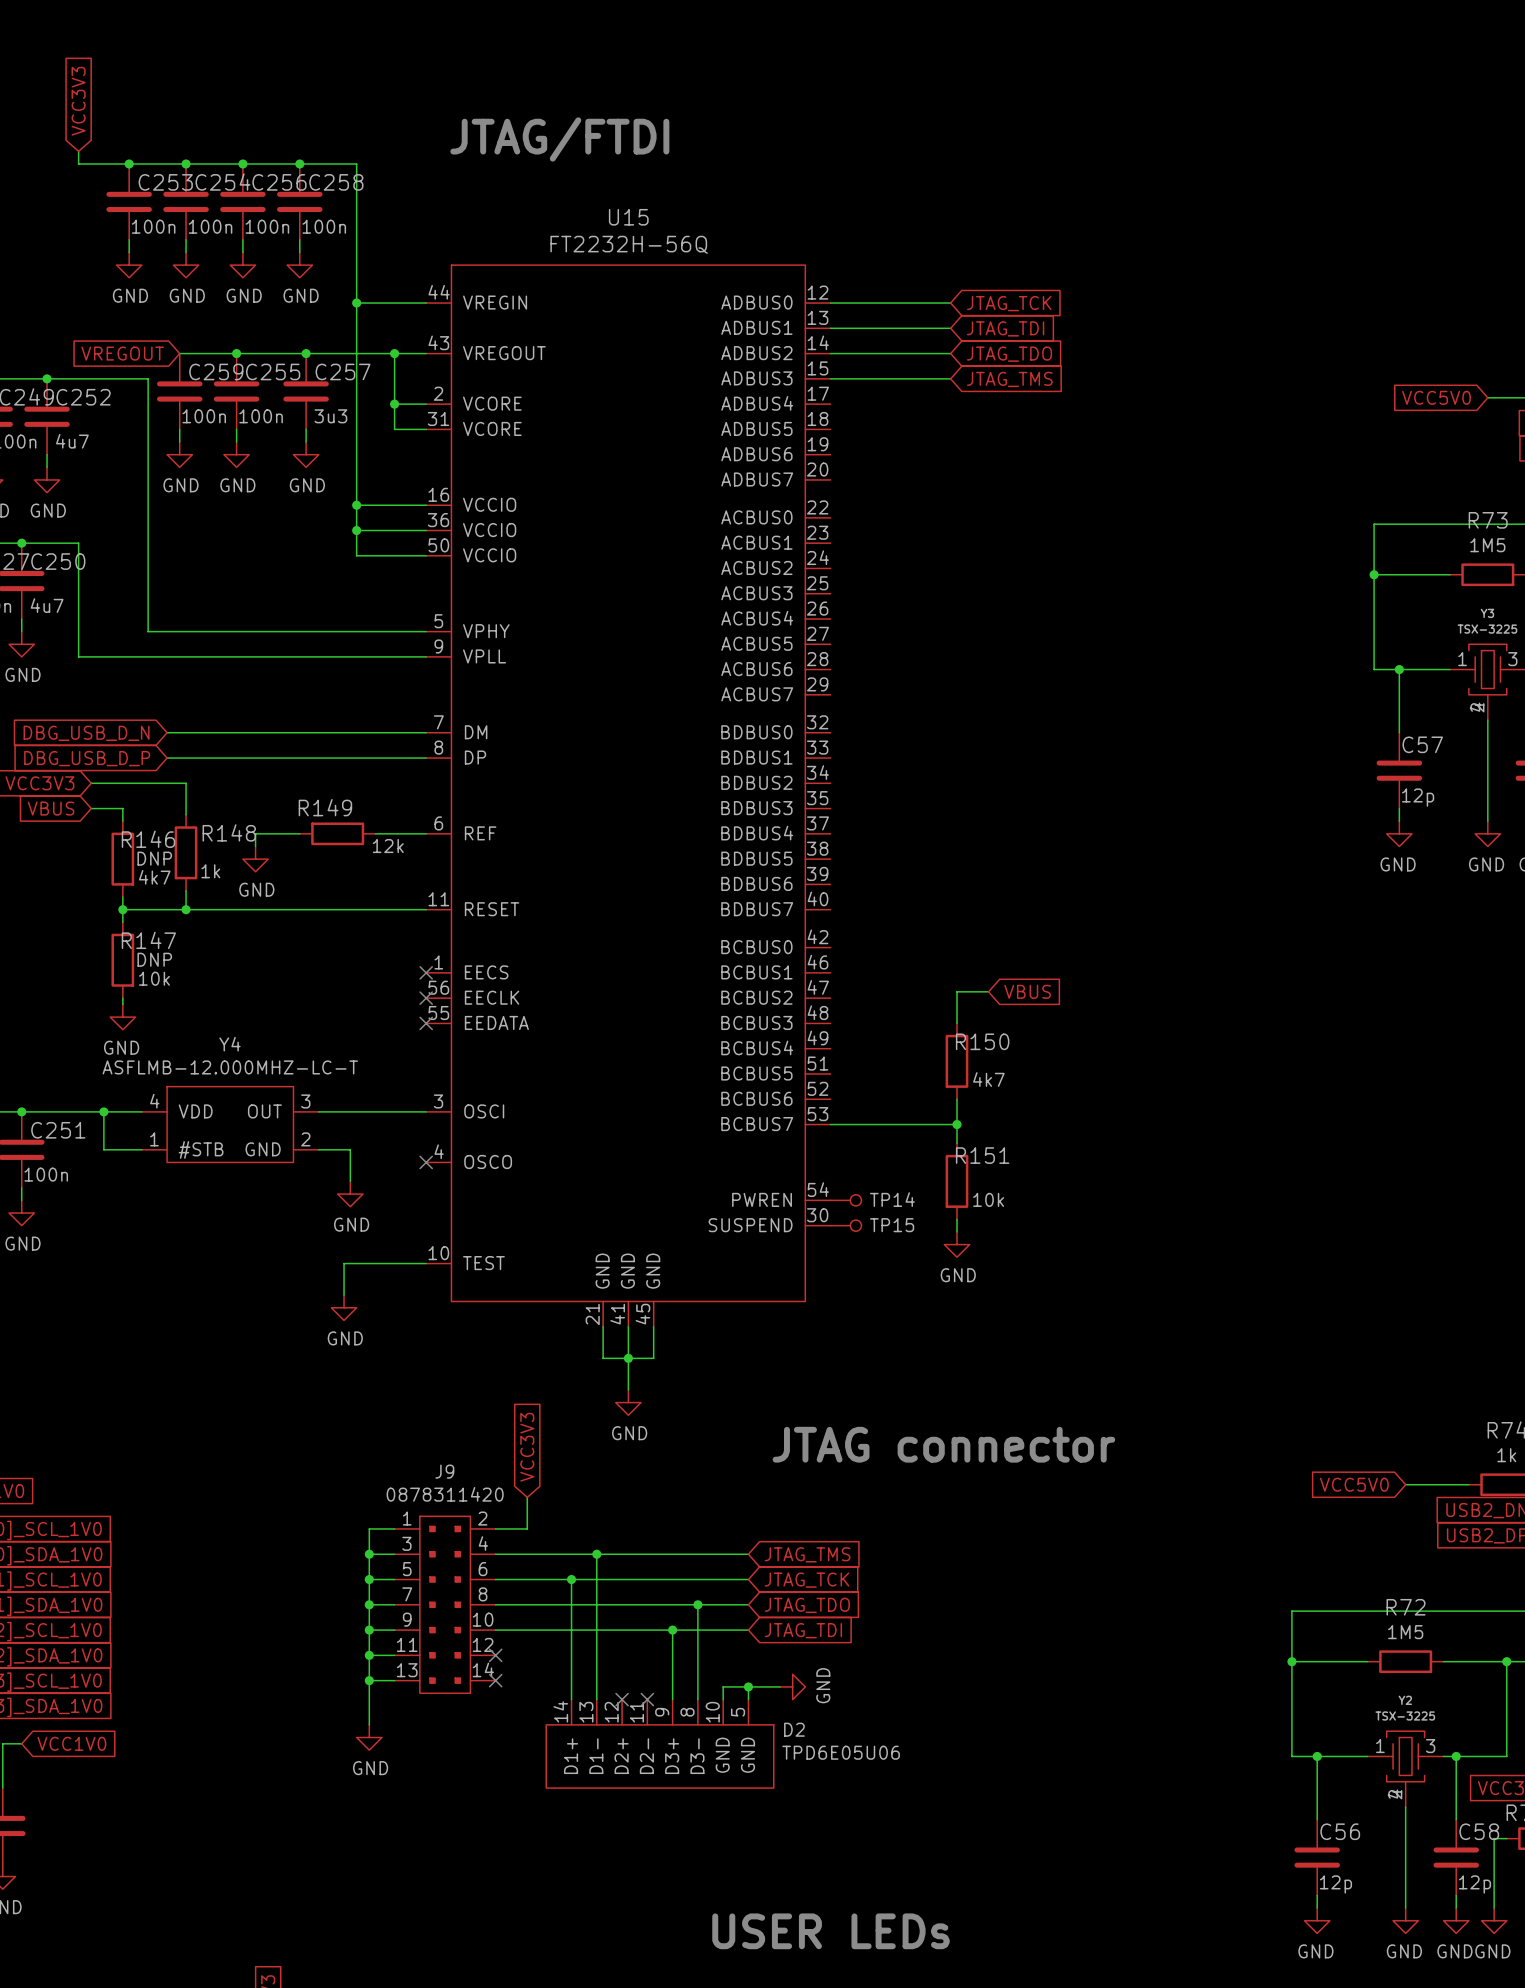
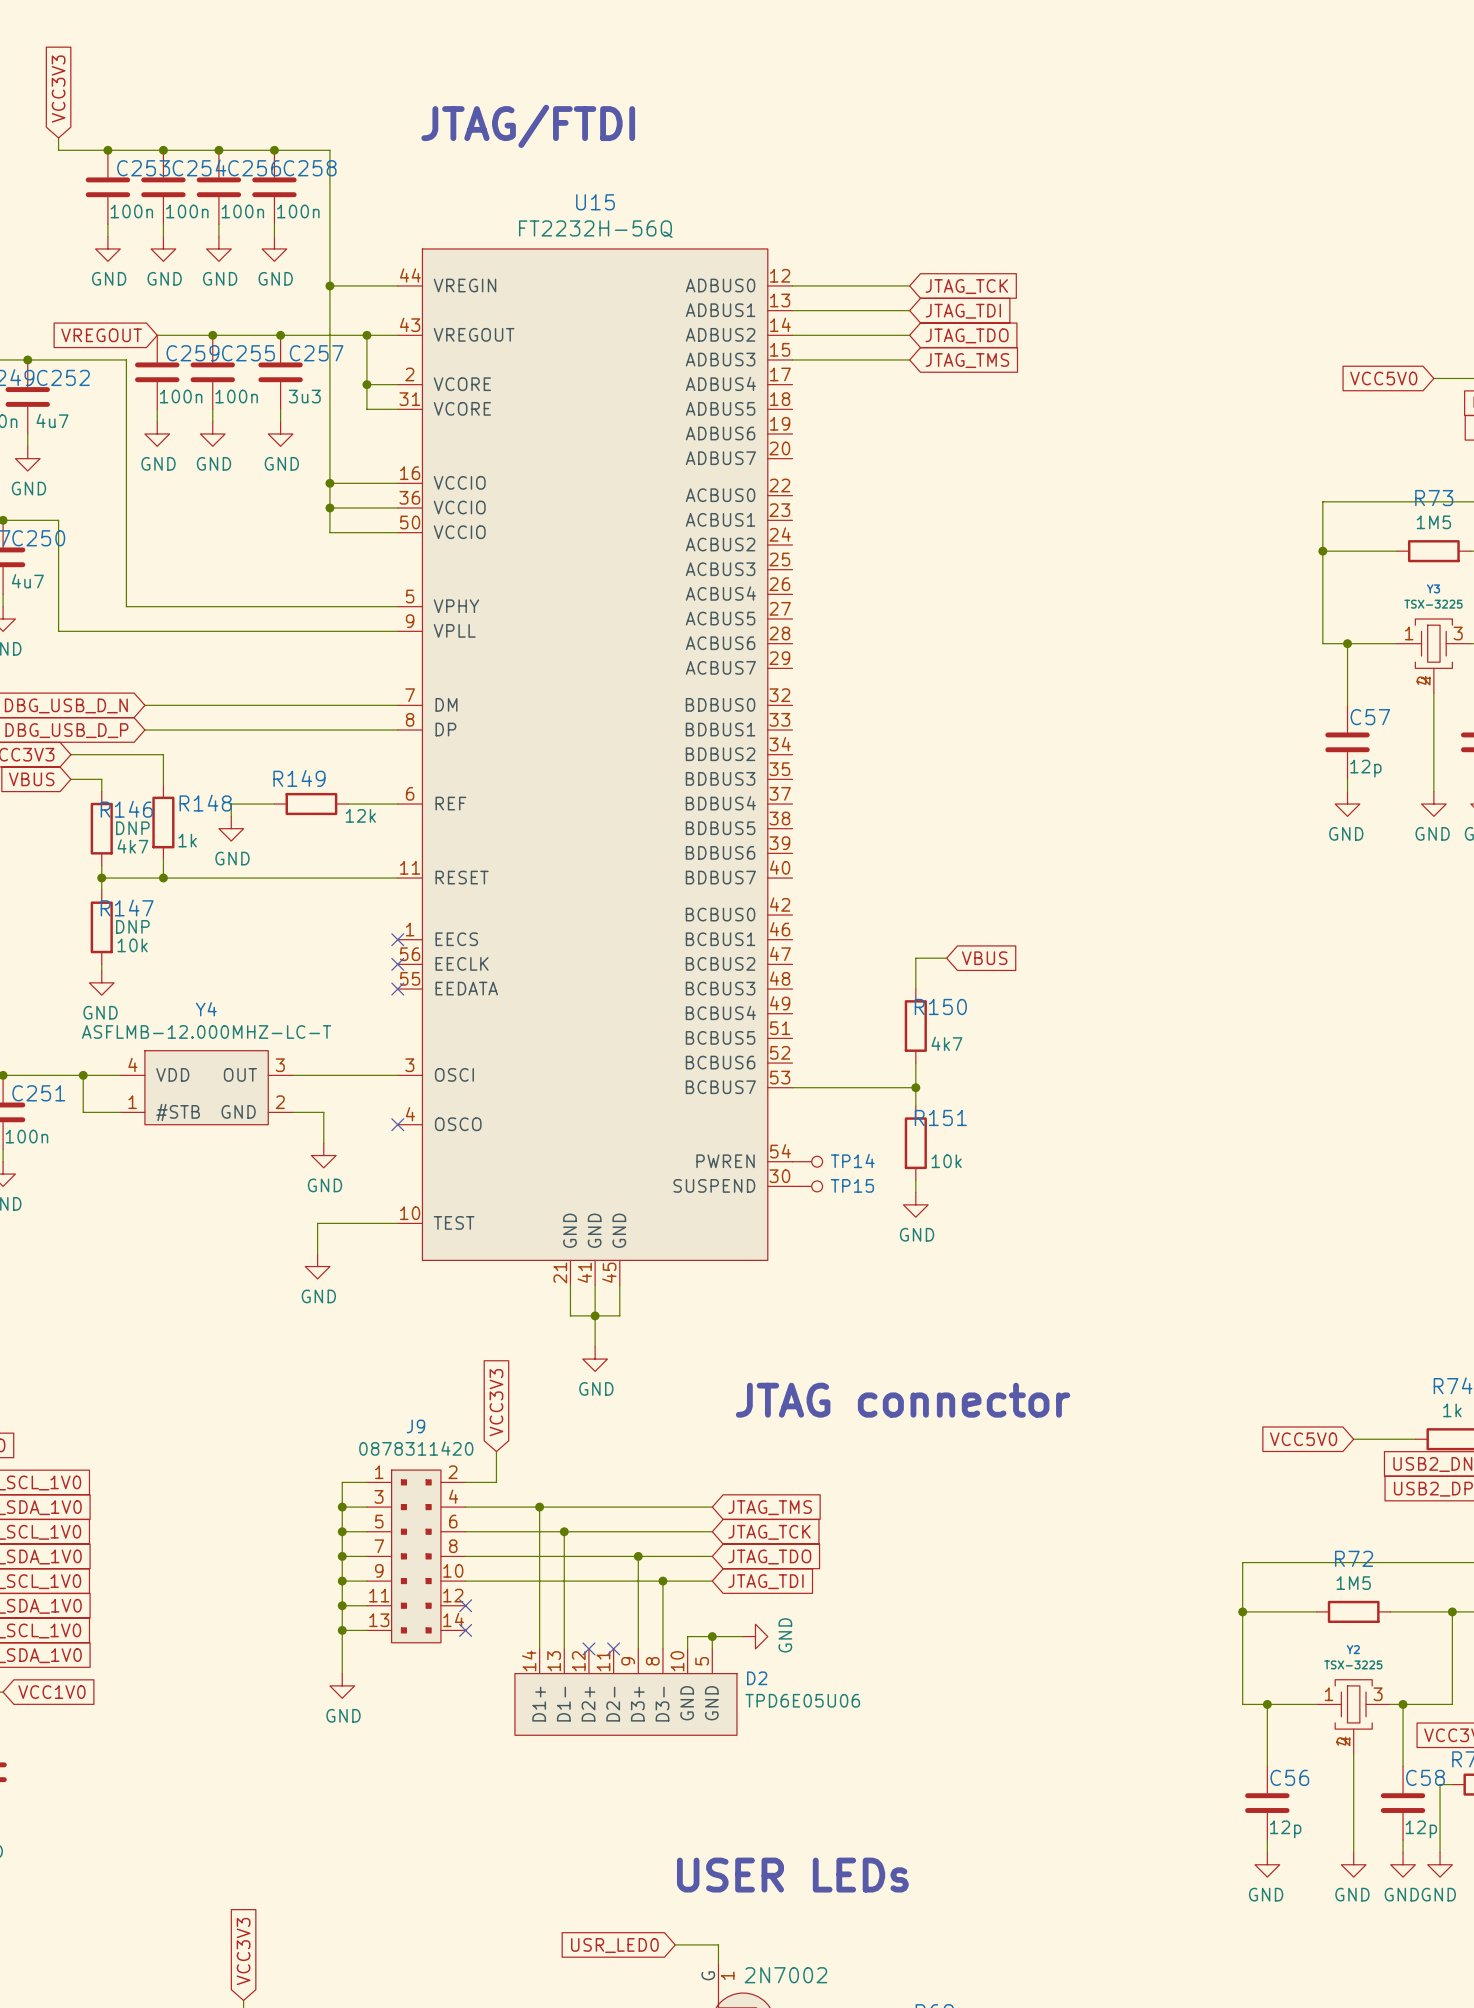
junction: none -> (539, 1507)
wire: (596, 1554) (596, 1579) -> (539, 1507) (539, 1531)
junction: (596, 1554) -> none
junction: (571, 1579) -> none
junction: none -> (564, 1531)
junction: none -> (638, 1556)
wire: (697, 1604) (697, 1630) -> (638, 1556) (638, 1581)
junction: (697, 1604) -> none
junction: (672, 1630) -> none
junction: none -> (662, 1581)

